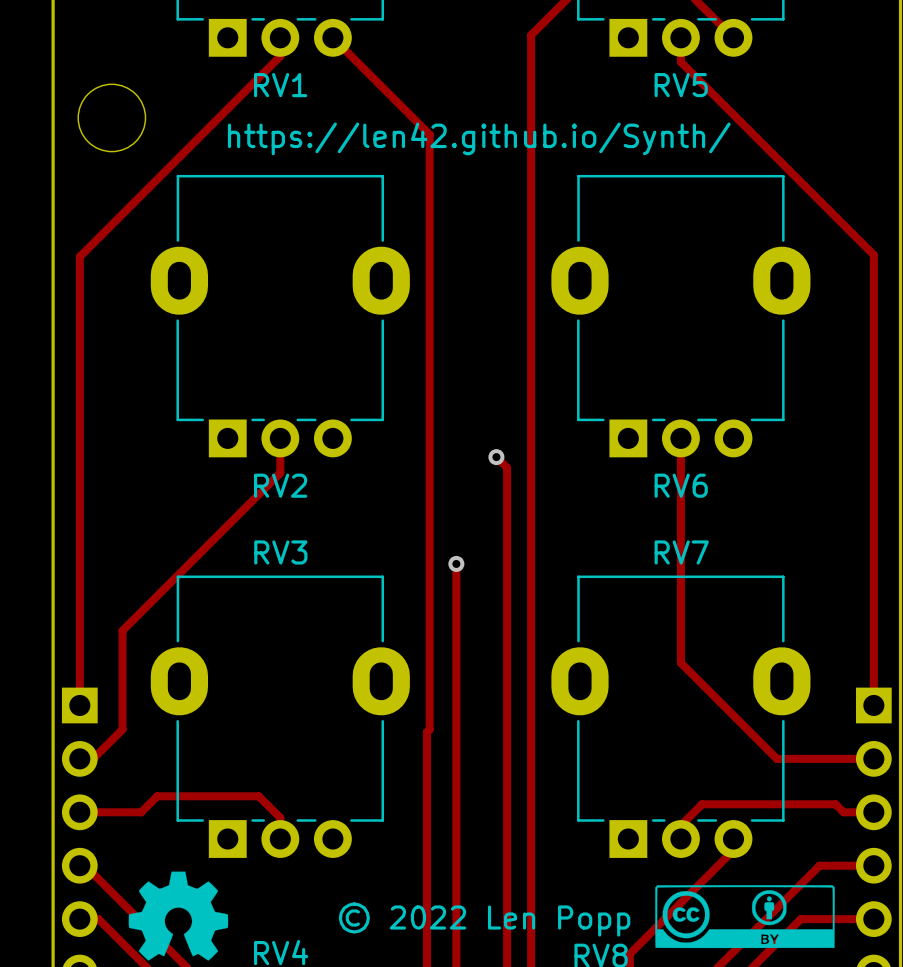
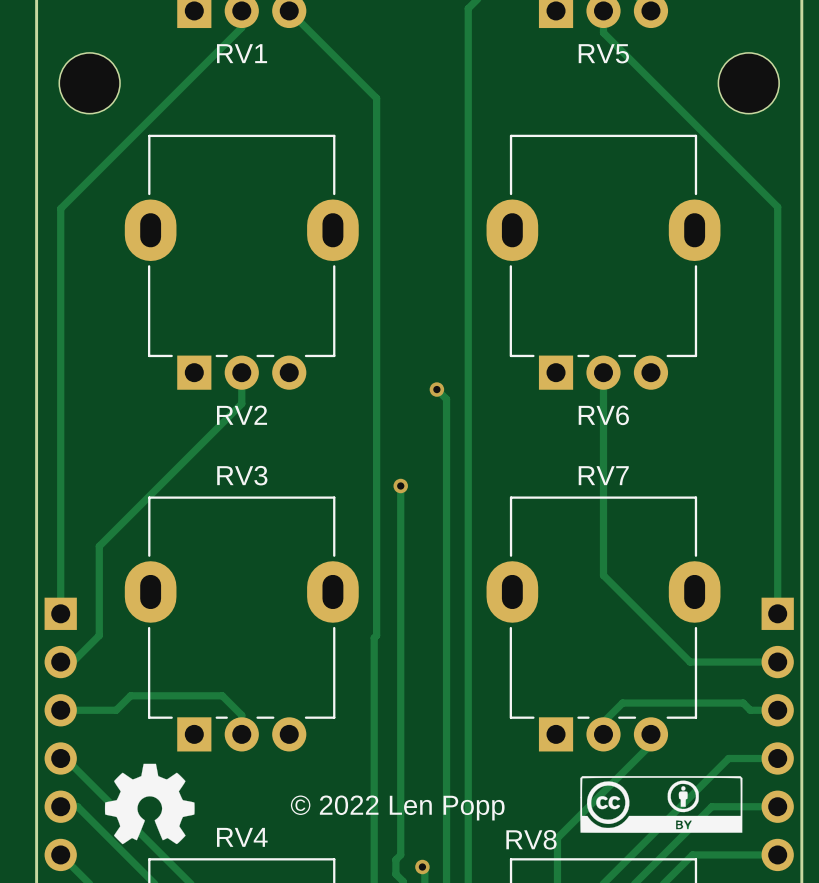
part: none -> (748, 83)
text: https://len42.github.io/Synth/ (479, 138) -> none

